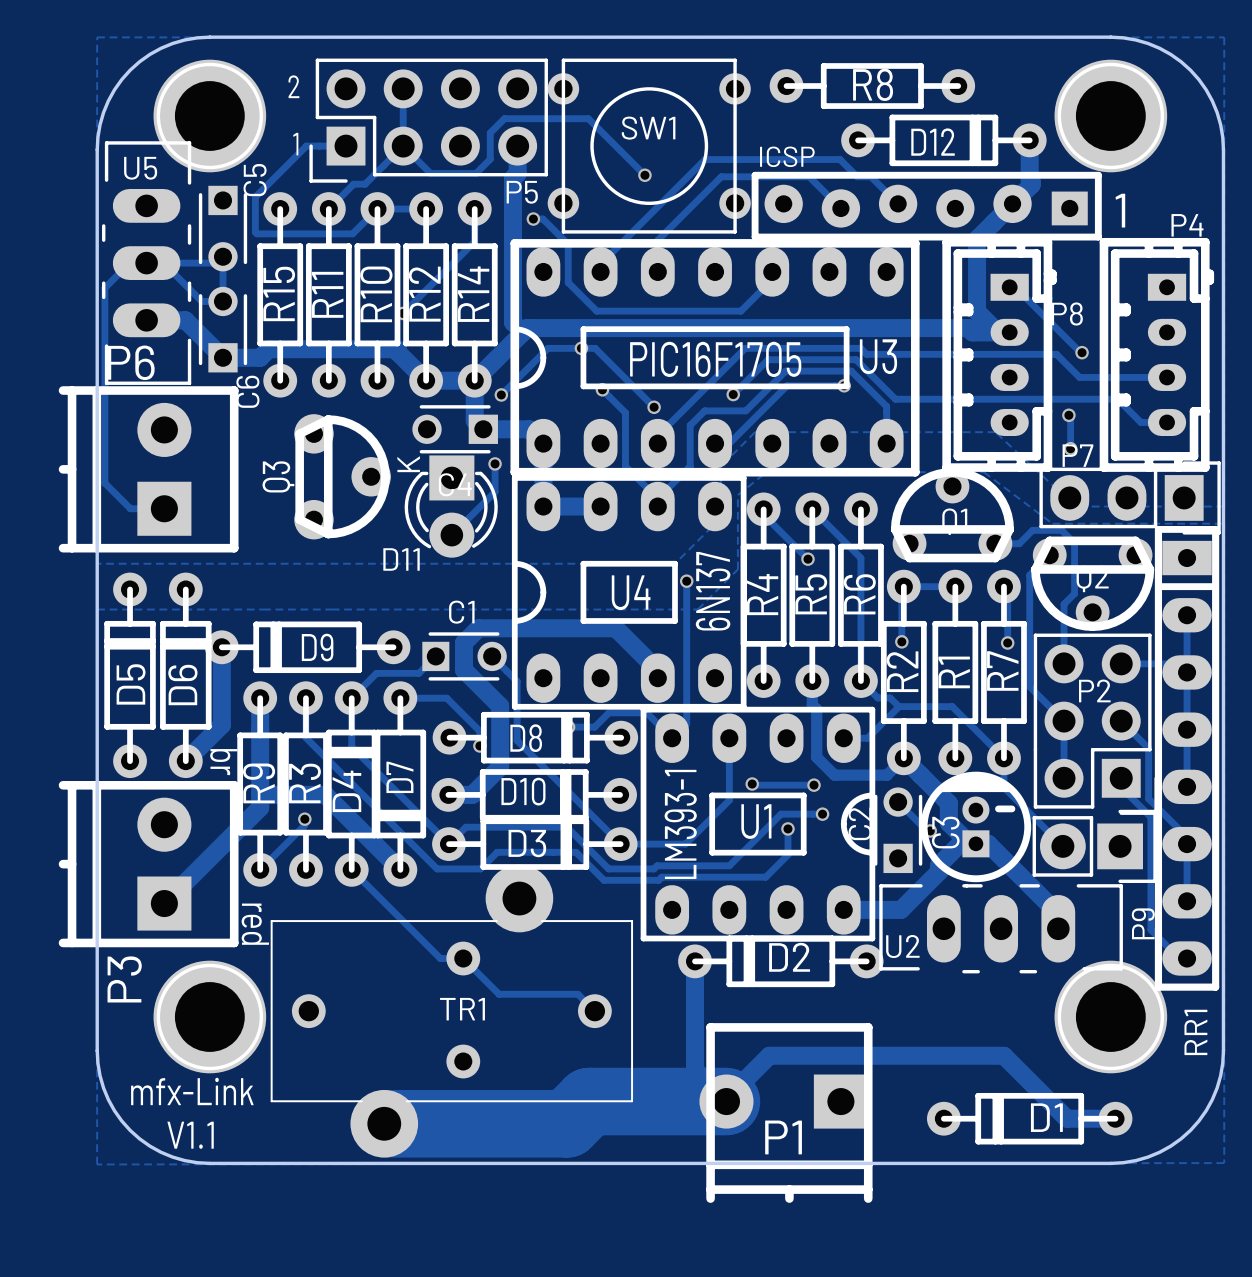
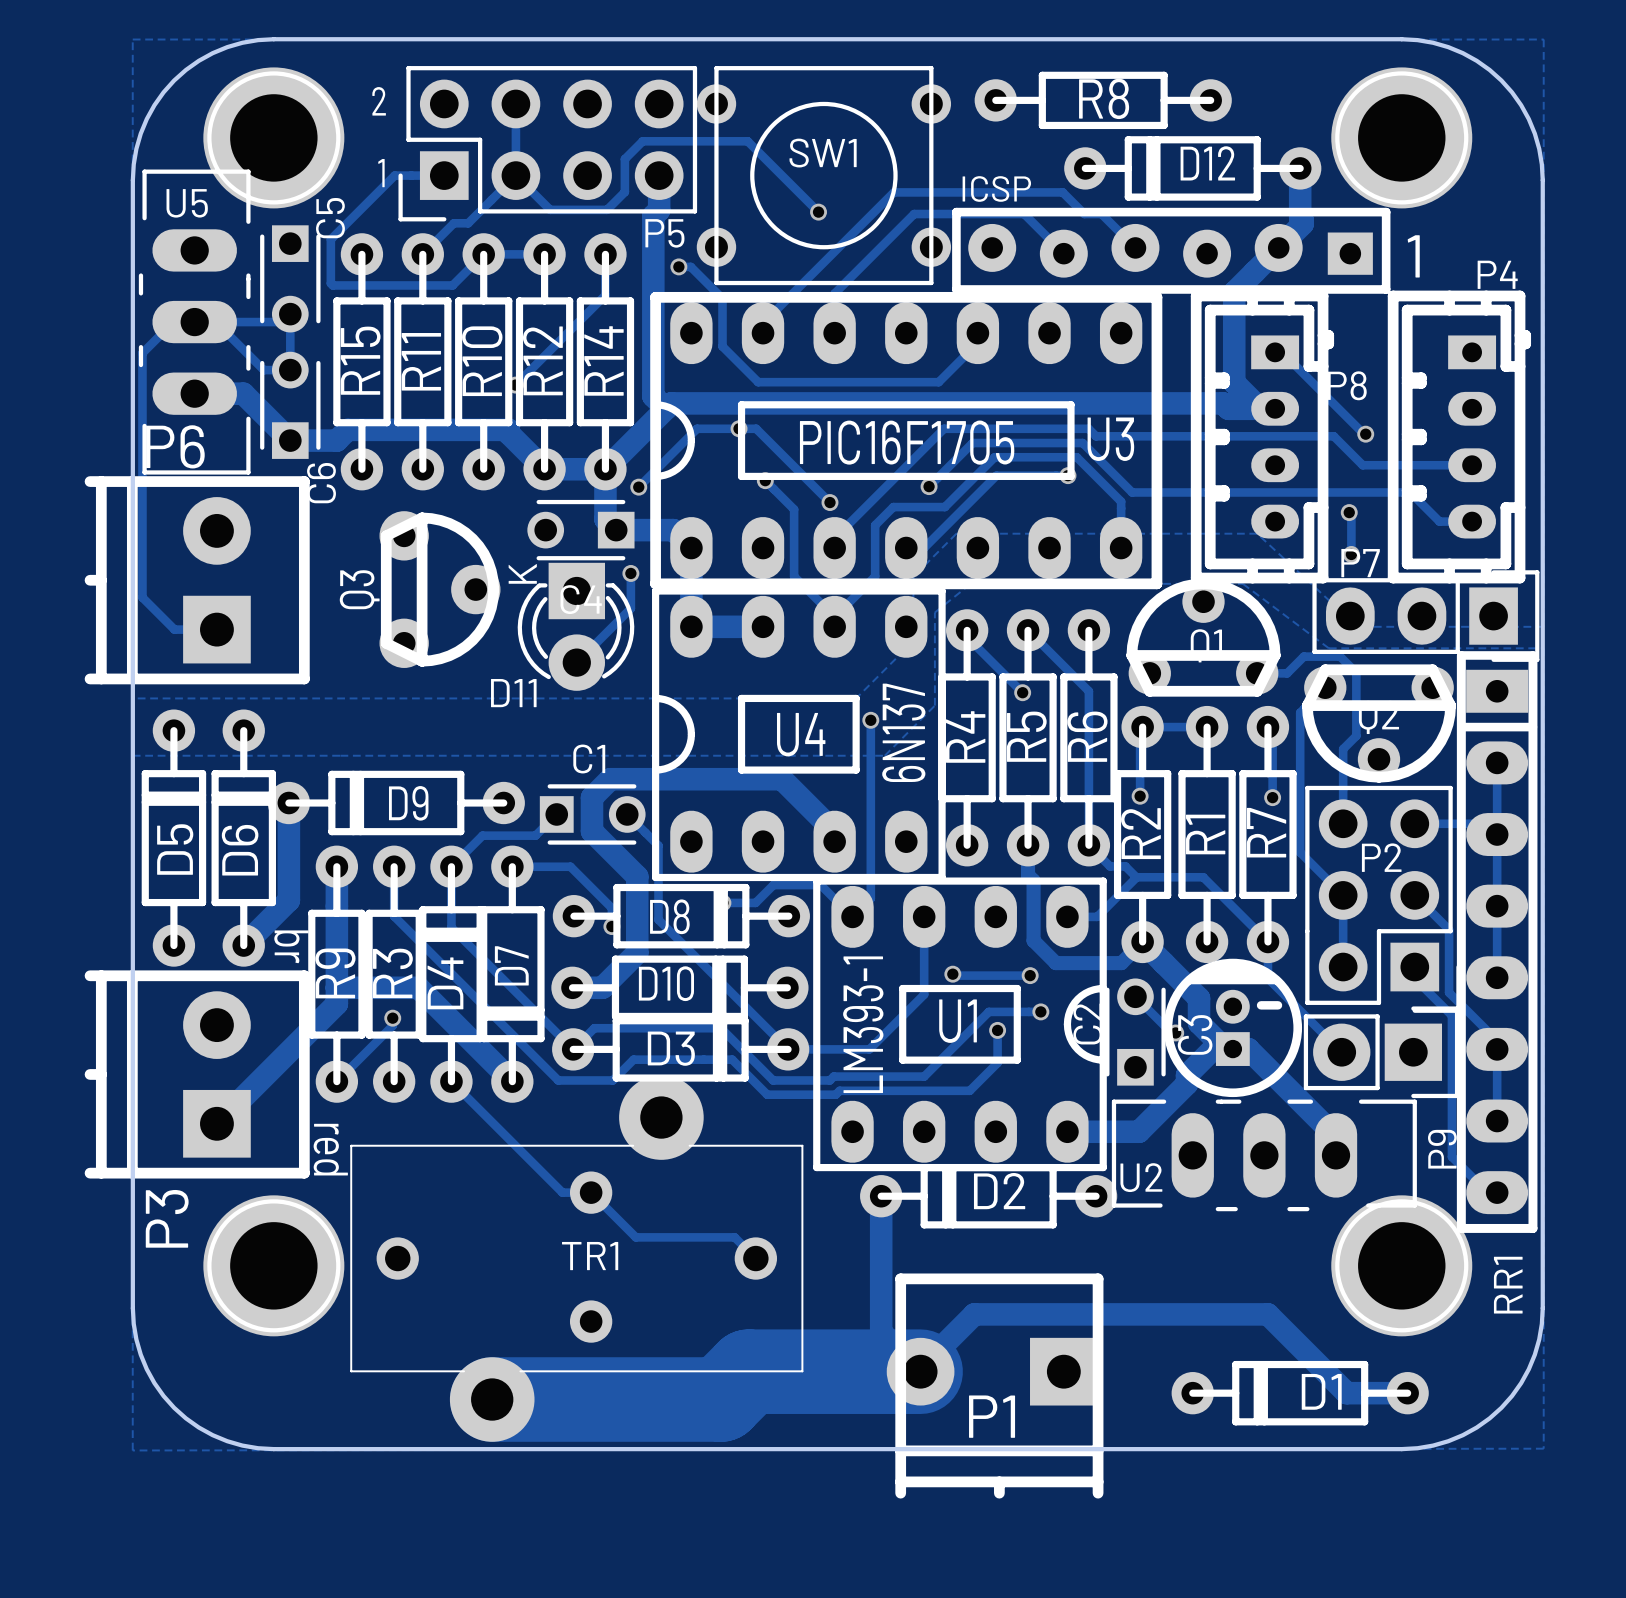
D12 rotation: 0° (943, 140) -> 180° (1192, 168)
text: mfx-Link (192, 1091) -> none
text: V1.1 (190, 1135) -> none

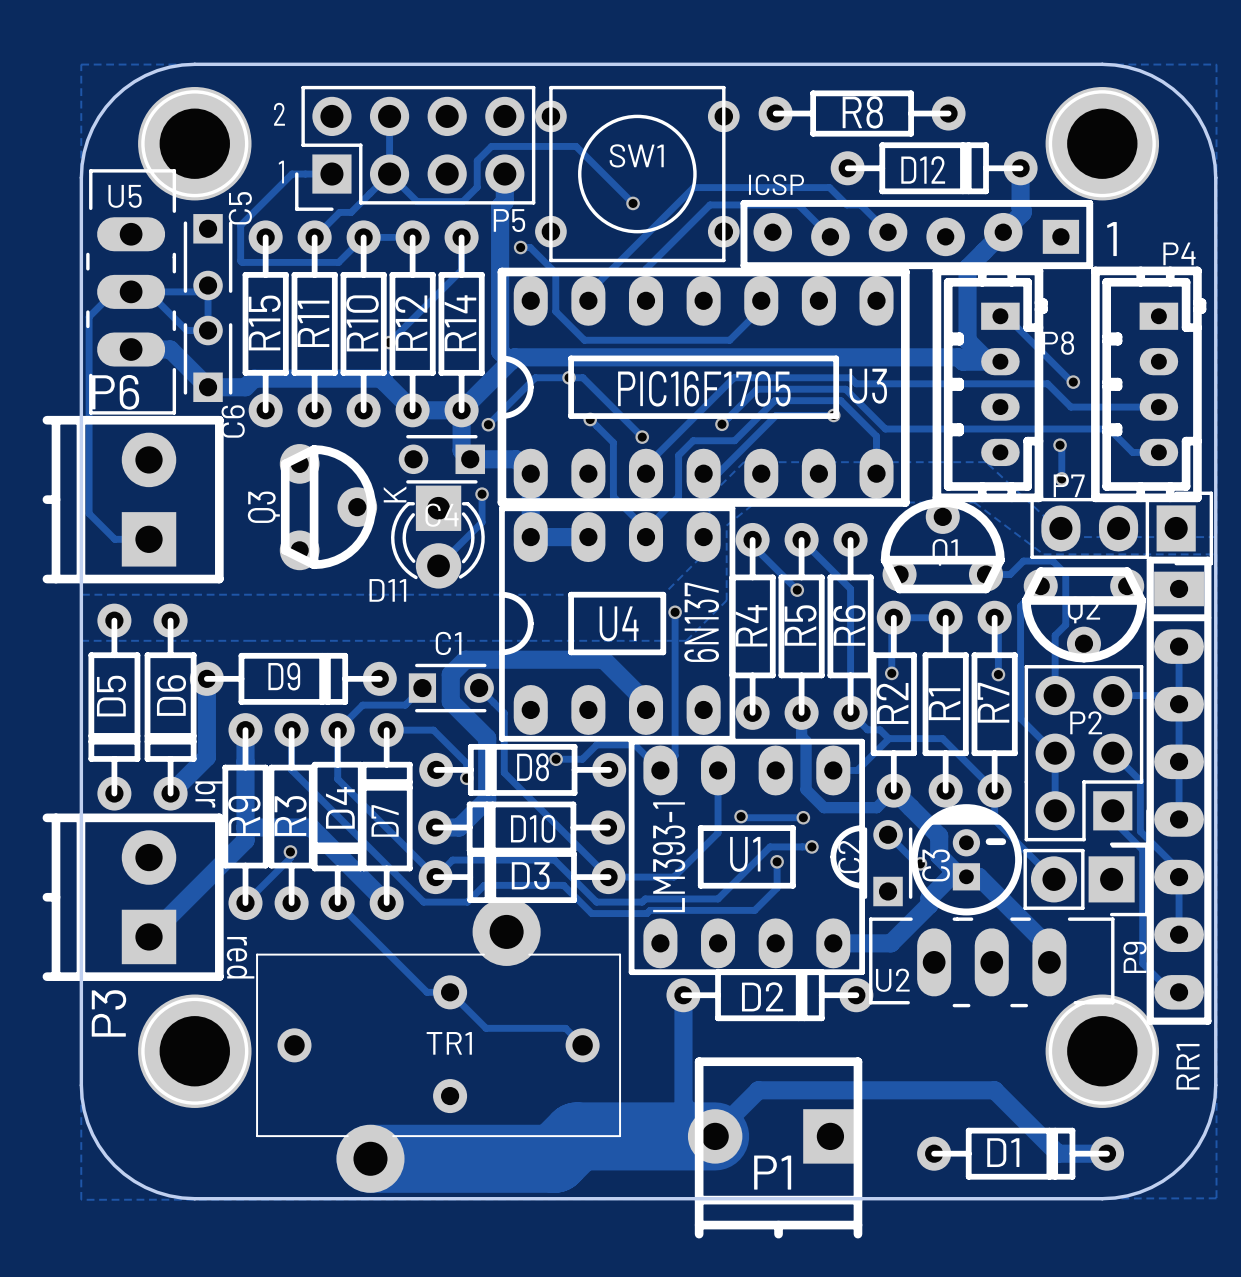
D12 rotation: 0° (1192, 168) -> 180° (934, 168)
D9 rotation: 0° (396, 803) -> 180° (293, 678)
D5 rotation: 0° (173, 838) -> 180° (114, 707)
D6 rotation: 0° (243, 838) -> 180° (170, 707)
D8 rotation: 0° (681, 916) -> 180° (522, 769)
D4 rotation: 0° (451, 974) -> 180° (337, 816)
D7 rotation: 0° (512, 974) -> 180° (386, 816)
D10 rotation: 0° (679, 987) -> 180° (521, 827)
D3 rotation: 0° (680, 1049) -> 180° (522, 877)
D2 rotation: 0° (988, 1196) -> 180° (769, 995)
D1 rotation: 0° (1300, 1393) -> 180° (1020, 1153)

